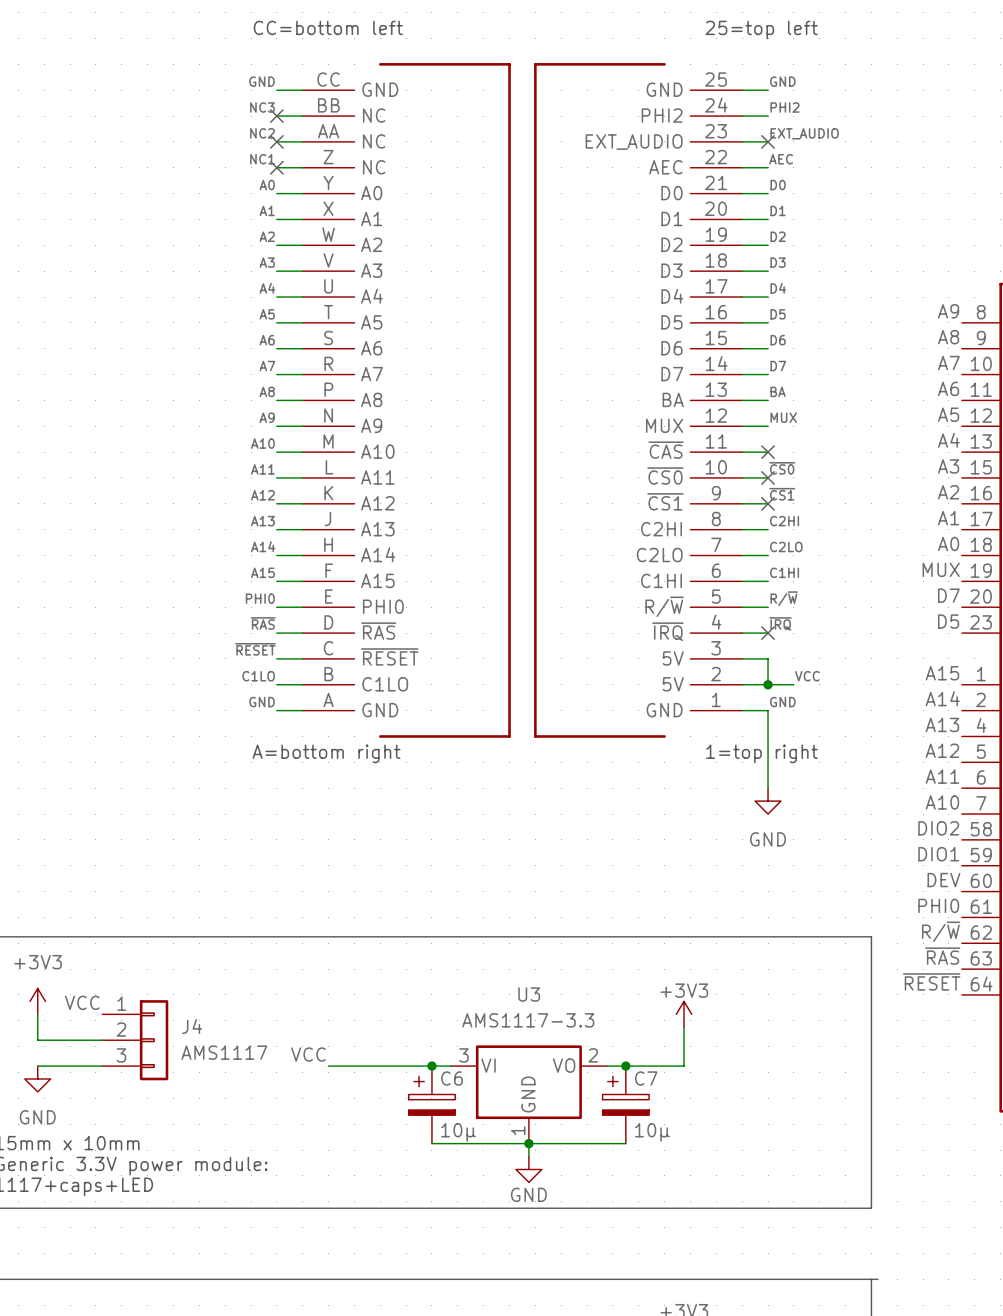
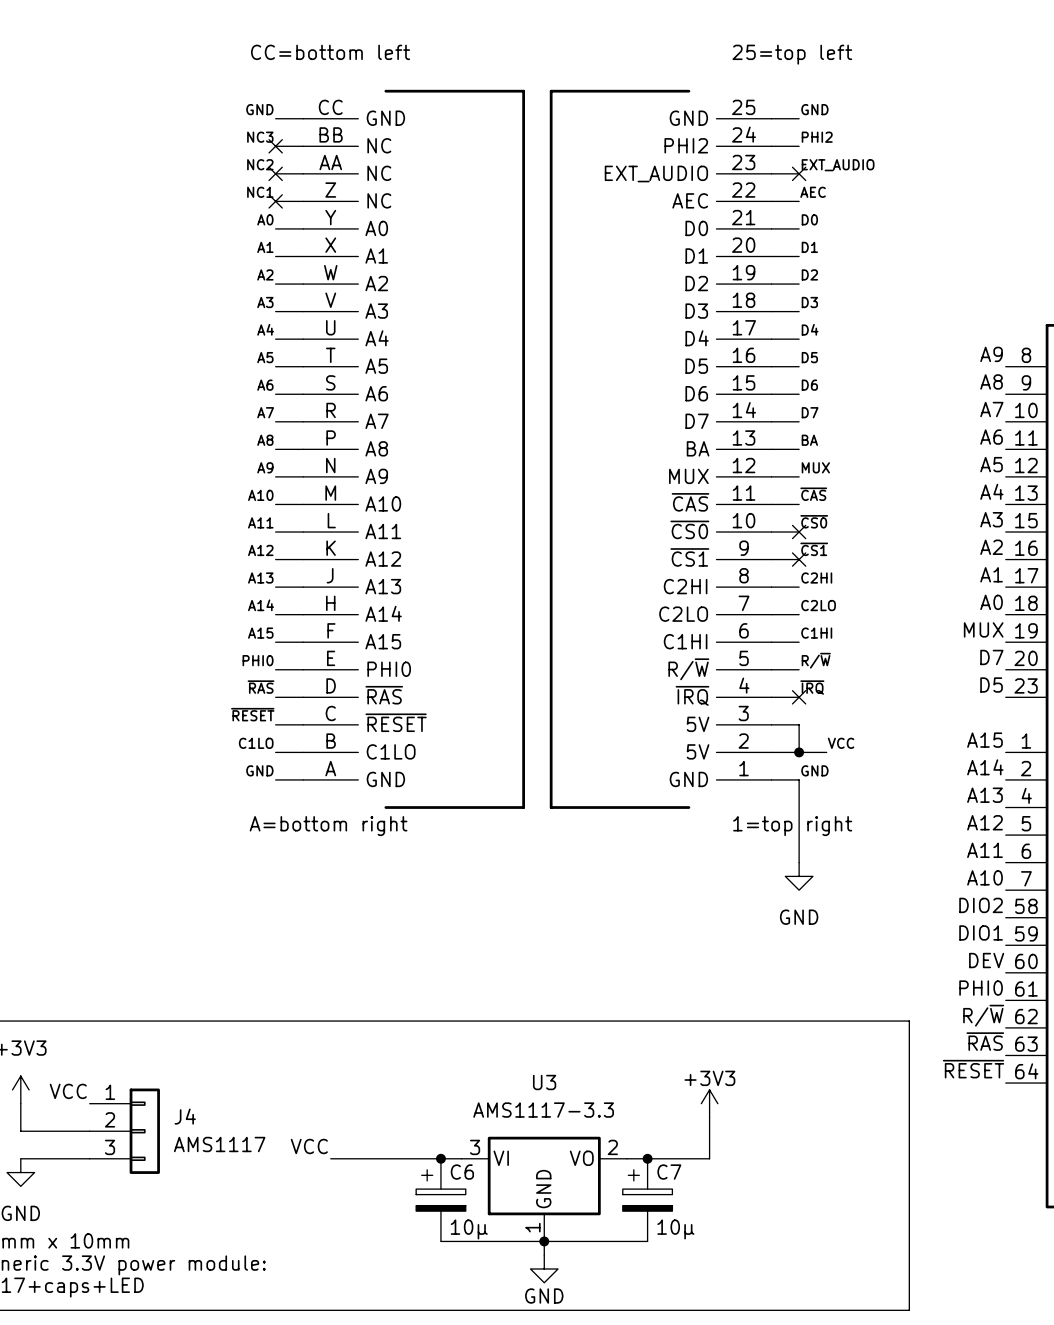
label: none -> ~{CAS} (813, 494)
no-connect mark: (768, 452) -> none

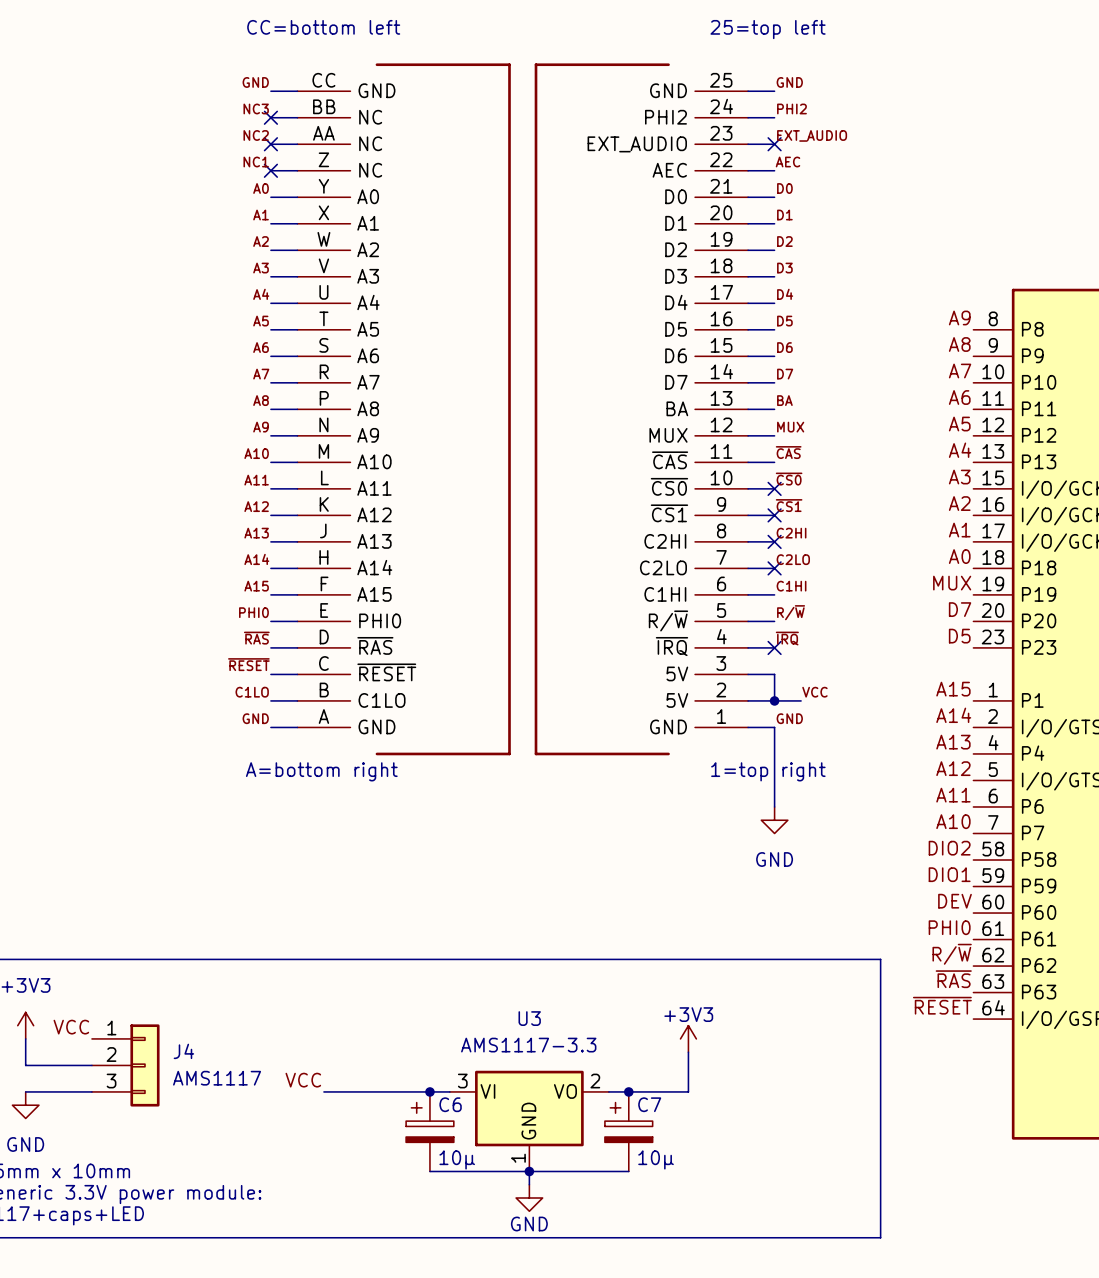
no-connect mark: none -> (774, 541)
no-connect mark: none -> (774, 568)

